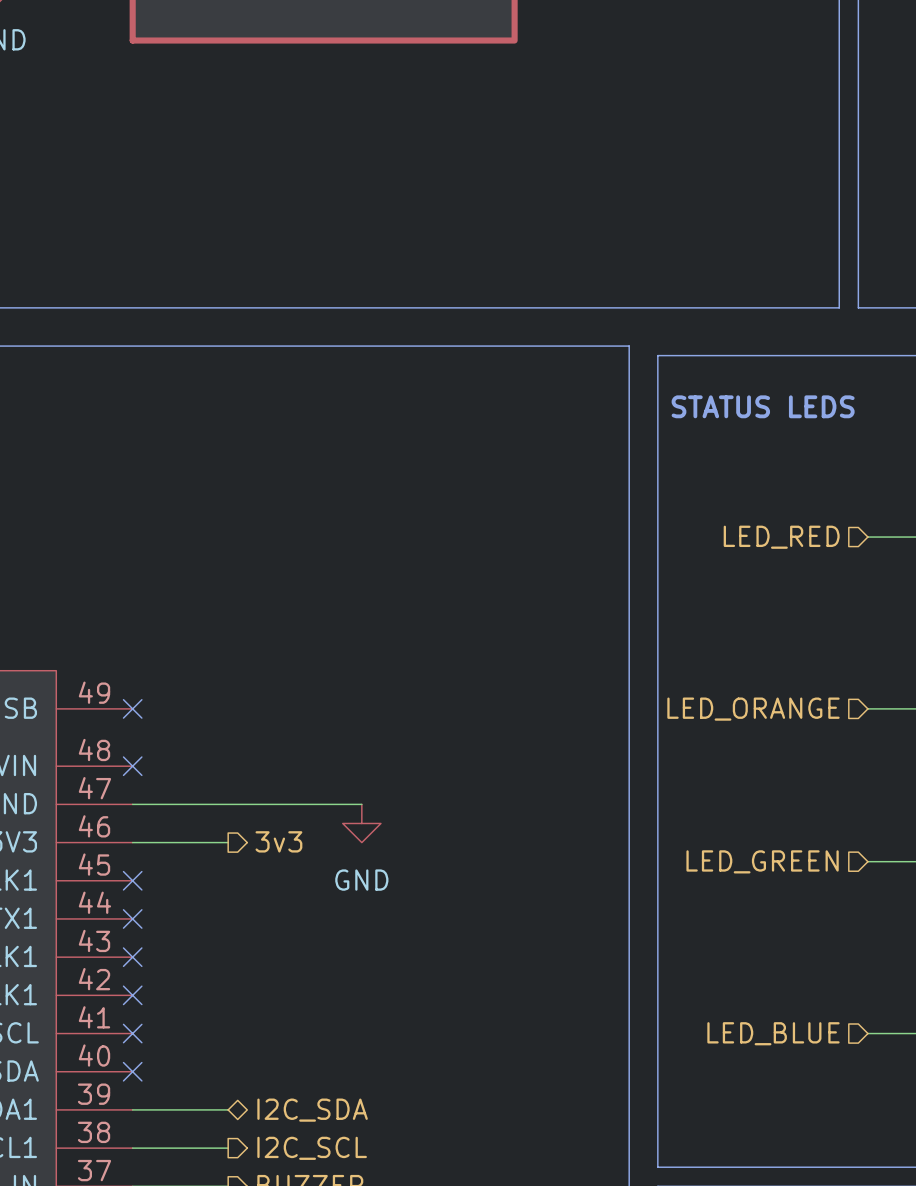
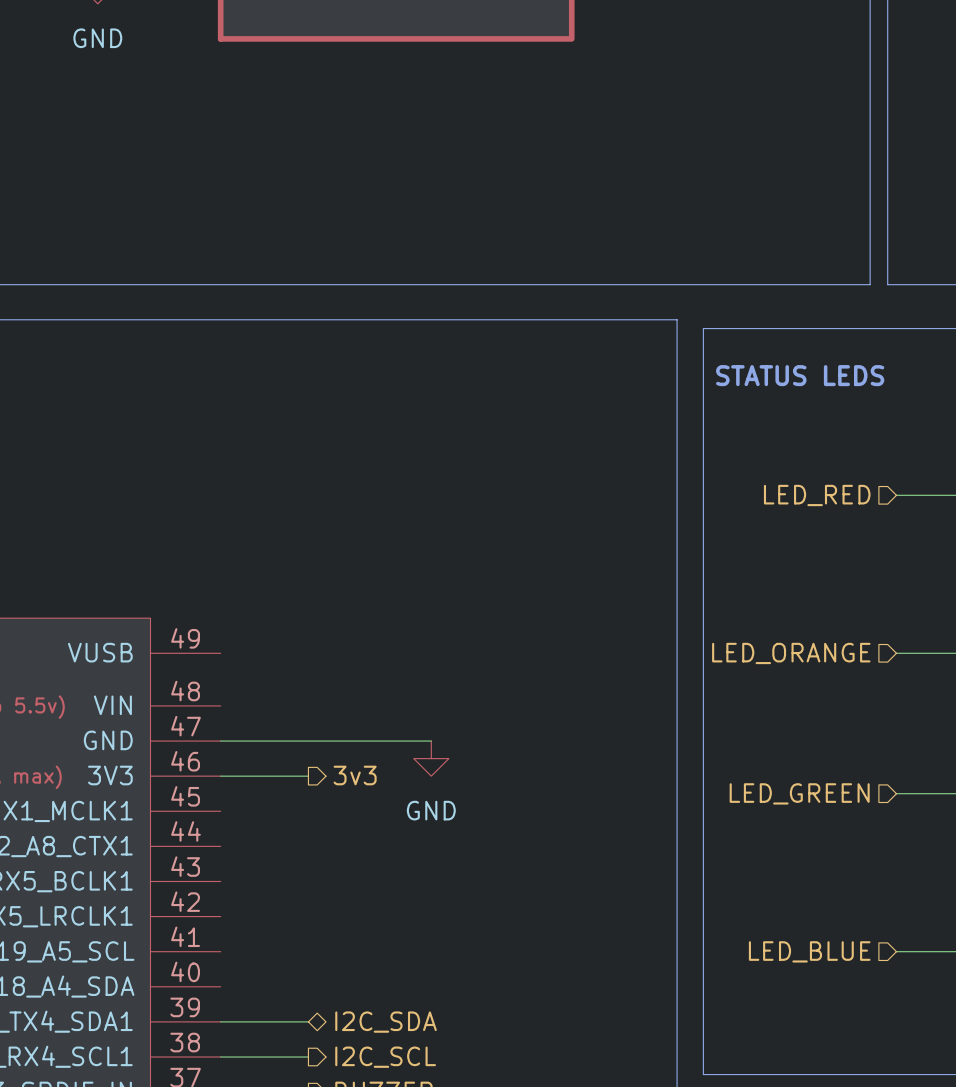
no-connect mark: (132, 708) -> none
no-connect mark: (132, 766) -> none
no-connect mark: (132, 880) -> none
no-connect mark: (132, 918) -> none
no-connect mark: (132, 957) -> none
no-connect mark: (132, 995) -> none
no-connect mark: (132, 1033) -> none
no-connect mark: (132, 1071) -> none

